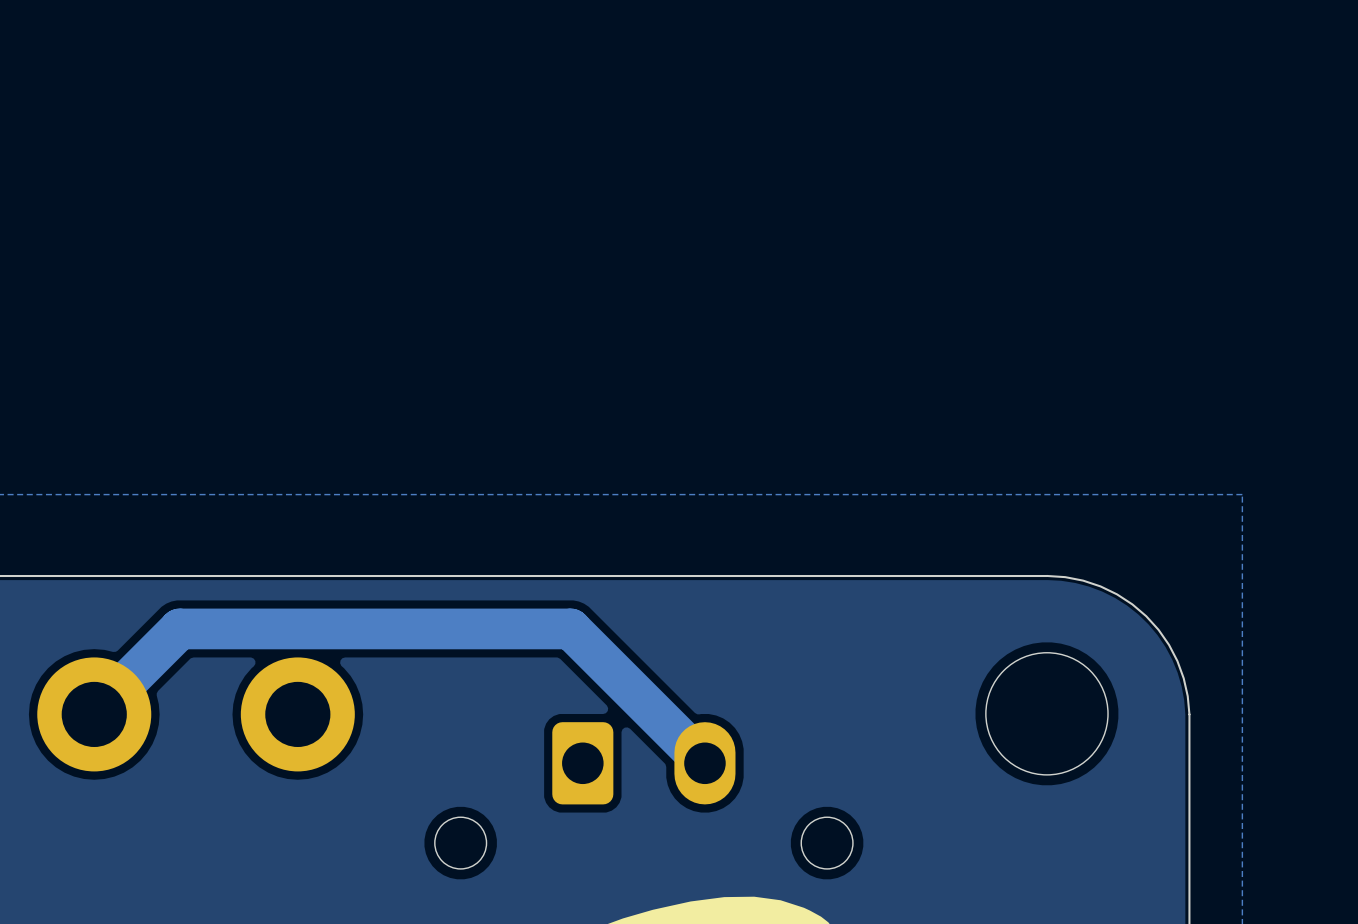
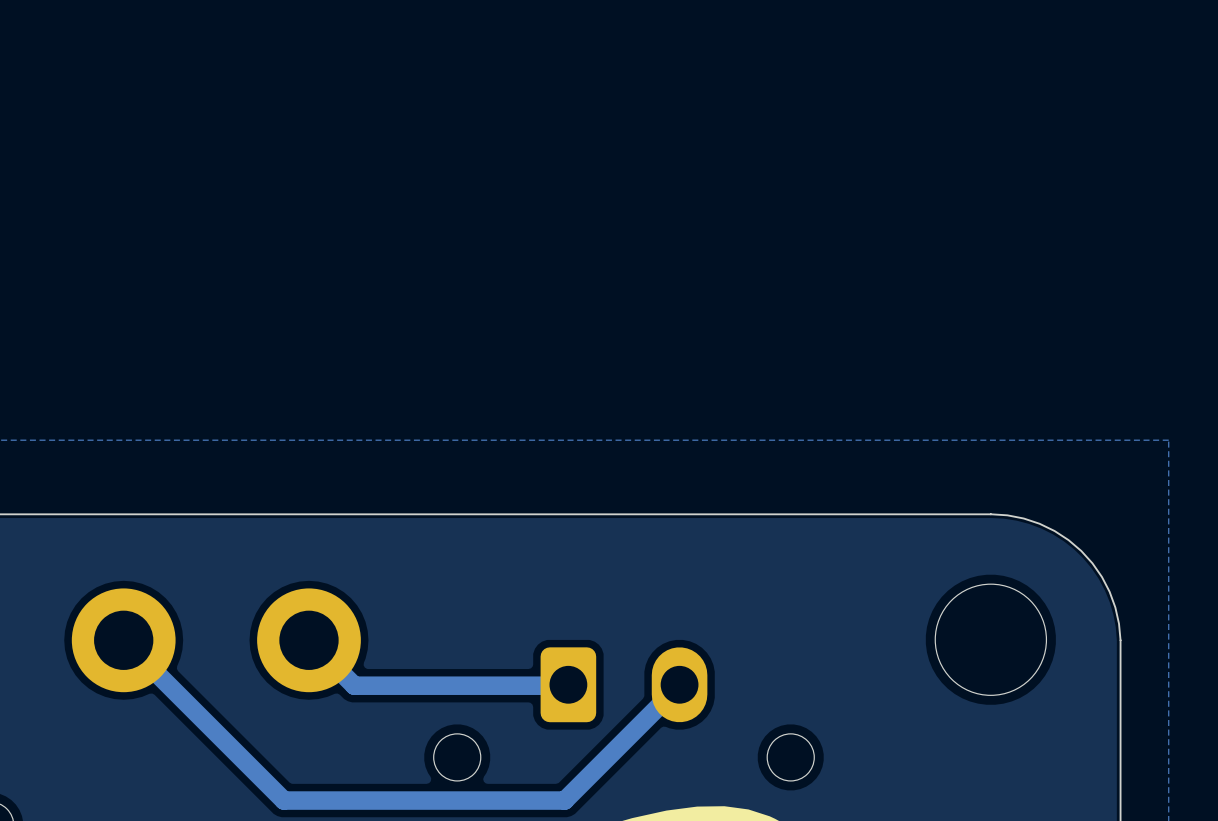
track: (94, 714) (179, 628) (570, 628) (704, 763) -> (123, 640) (283, 800) (564, 800) (679, 685)
track: none -> (308, 640) (354, 685) (568, 685)

